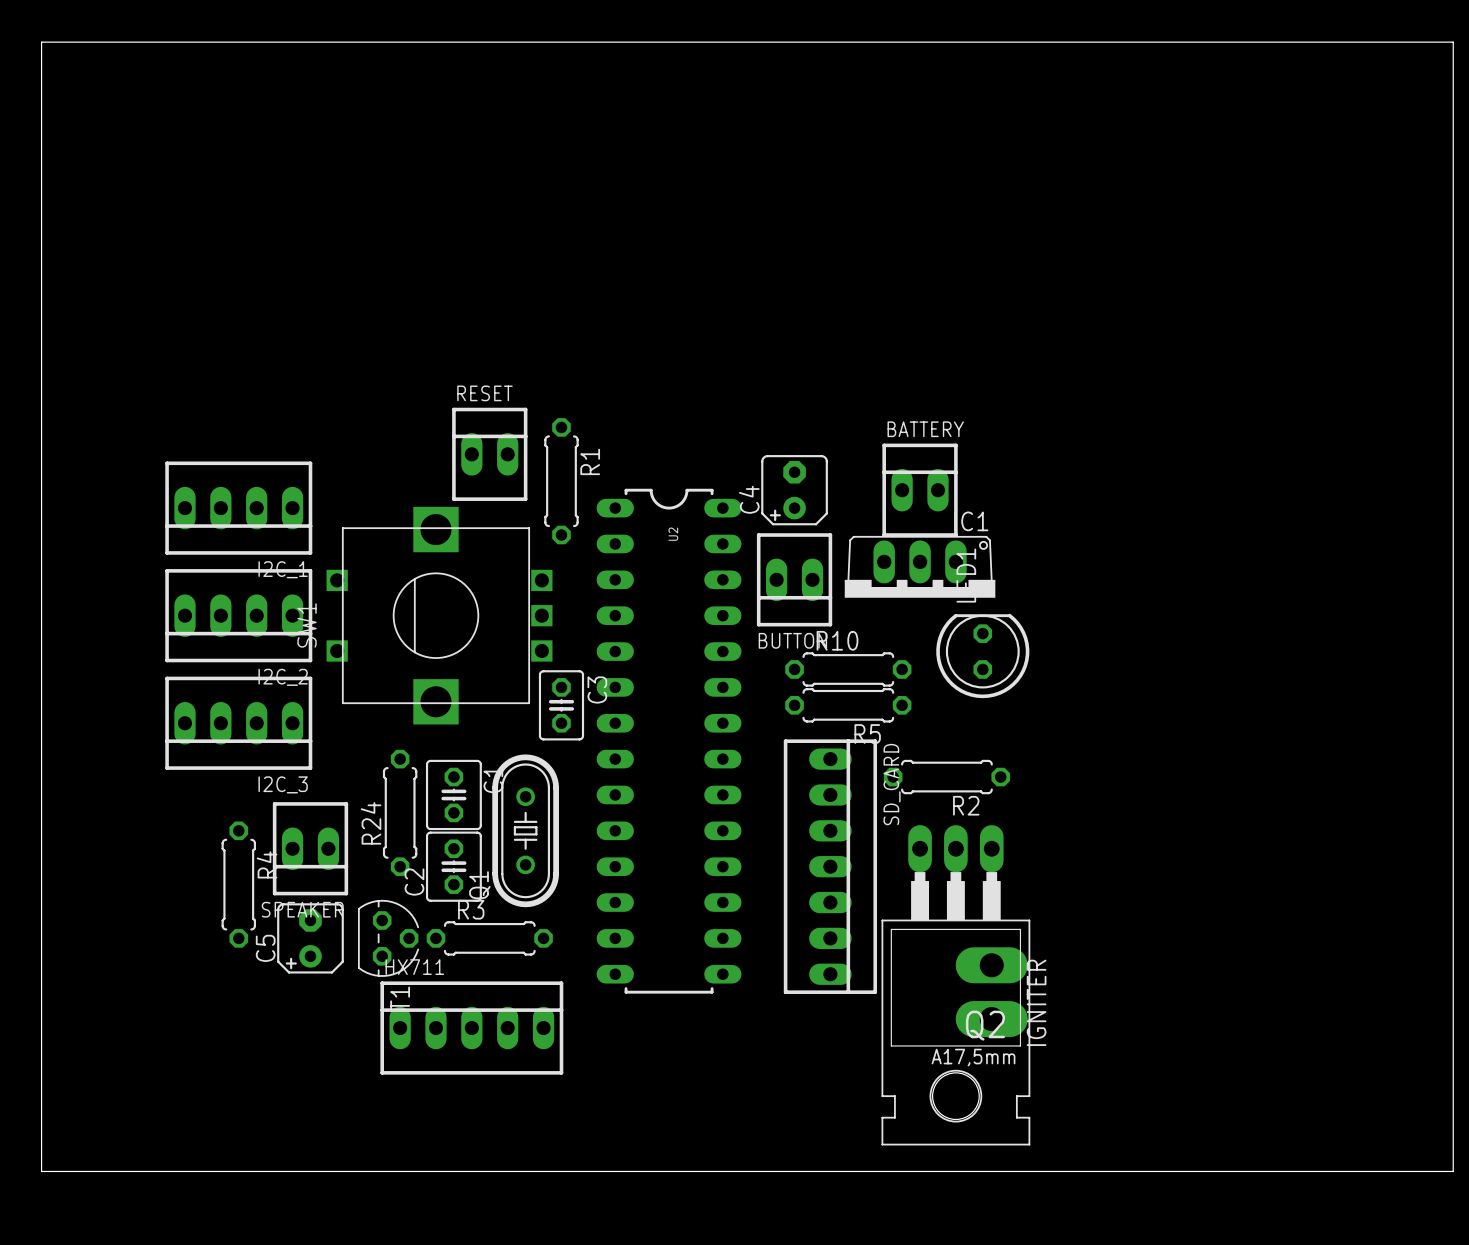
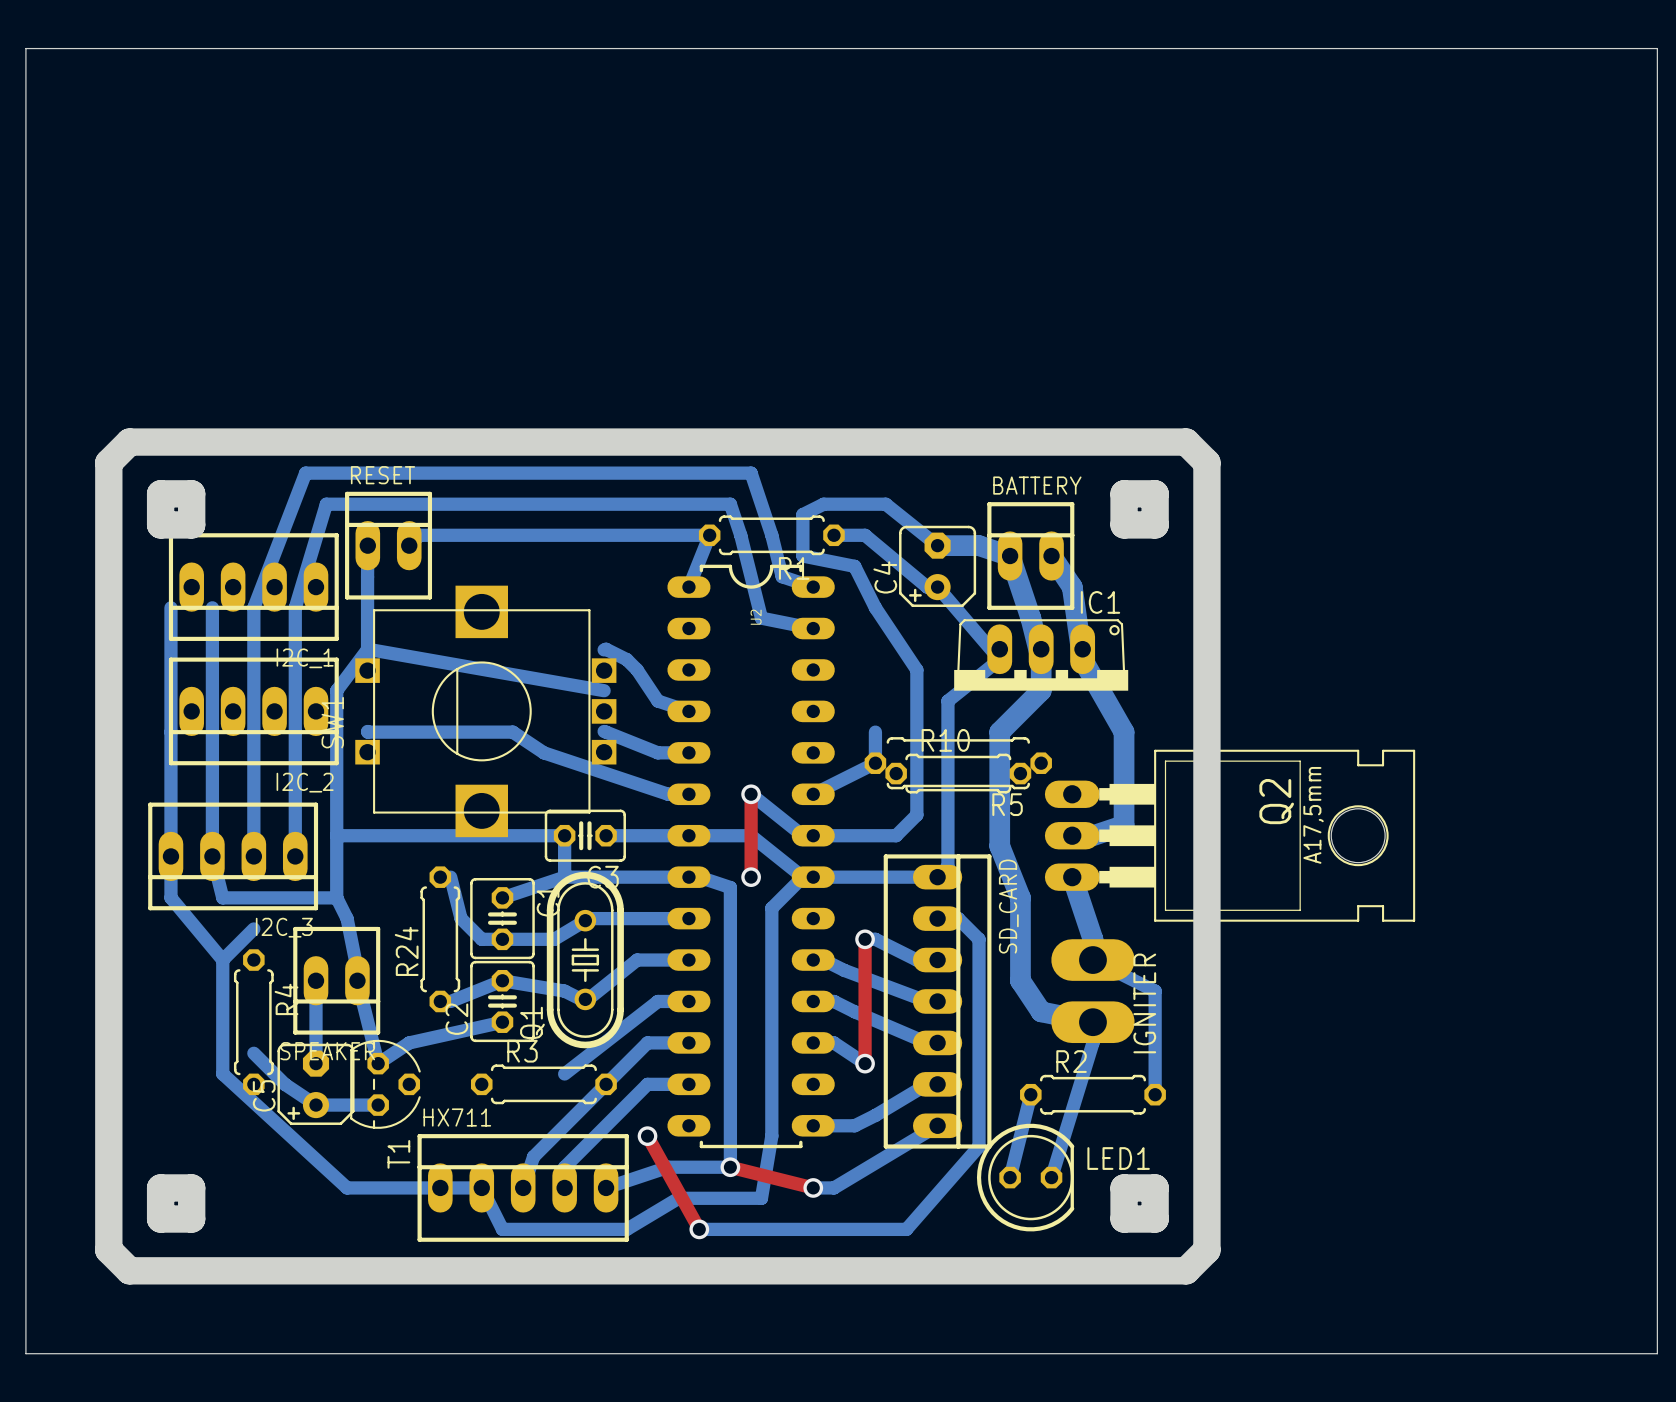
board edge: none -> (129, 442) (1186, 442) (1206, 462) (1206, 1250) (1186, 1270) (129, 1270) (108, 1250) (108, 462) (129, 442)
board edge: none -> (160, 493) (160, 524) (191, 524) (191, 493) (160, 493)
board edge: none -> (1124, 493) (1124, 524) (1155, 524) (1155, 493) (1124, 493)
RESET position: (489, 454) -> (388, 545)
bottom track: none -> (833, 535) (865, 535) (927, 587) (937, 587) (999, 659) (947, 701) (947, 866) (937, 877) (802, 877)
bottom track: none -> (367, 545) (367, 576) (367, 659) (367, 649)
bottom track: none -> (409, 545) (419, 535) (709, 535) (688, 587)
R1 rotation: 0° (561, 481) -> 90° clockwise (771, 535)
R1 position: (561, 481) -> (771, 535)
bottom track: none -> (1051, 556) (1072, 587) (1082, 659) (1124, 732) (1124, 825) (1092, 835) (1072, 835)
C4 position: (794, 490) -> (937, 566)
BATTERY position: (920, 490) -> (1030, 556)
bottom track: none -> (813, 587) (782, 576) (771, 535) (751, 473) (305, 473) (253, 607) (253, 856)
bottom track: none -> (170, 607) (170, 897) (222, 960)
bottom track: none -> (212, 607) (212, 856) (222, 897) (336, 897)
bottom track: none -> (813, 628) (761, 618) (740, 535) (730, 504) (326, 504) (295, 607) (295, 856)
bottom track: none -> (367, 649) (604, 690)
bottom track: none -> (367, 649) (336, 690) (336, 897)
bottom track: none -> (604, 649) (626, 659) (637, 669) (657, 701) (688, 711)
BUTTON: (794, 579) -> none
bottom track: none -> (367, 731) (512, 732) (543, 752) (668, 794) (688, 794)
bottom track: none -> (604, 731) (657, 752) (688, 752)
bottom track: none -> (875, 732) (875, 763) (813, 794)
LED1 rotation: 0° (982, 656) -> 90° clockwise (1025, 1177)
LED1 position: (982, 656) -> (1025, 1177)
bottom track: none -> (751, 794) (802, 835) (896, 835) (916, 815) (916, 669) (875, 607) (854, 566) (802, 556) (802, 514) (823, 504) (885, 504) (937, 545) (979, 545) (1010, 556) (1030, 618) (1041, 659) (1041, 690) (999, 732) (999, 846) (1020, 897) (1020, 980) (1041, 1011) (1092, 1022) (1092, 1042) (1051, 1177)
top track: none -> (751, 794) (751, 877)
via: none -> (751, 794)
R5 footprint: [785, 688, 912, 723] -> [864, 737, 1052, 790]
C3 rotation: 0° (561, 705) -> 90° clockwise (585, 835)
I2C_3 position: (238, 723) -> (233, 856)
bottom track: none -> (336, 835) (564, 835) (564, 877)
bottom track: none -> (606, 835) (751, 835) (802, 877)
bottom track: none -> (450, 877) (461, 918) (481, 939) (554, 939) (585, 920) (585, 918) (688, 918)
bottom track: none -> (564, 877) (699, 877) (730, 887) (730, 1167) (668, 1167) (606, 1187)
bottom track: none -> (564, 877) (502, 897)
via: none -> (751, 877)
bottom track: none -> (802, 877) (771, 908) (771, 1136) (761, 1198) (678, 1198) (626, 1229) (502, 1229) (481, 1187) (347, 1187) (222, 1073) (222, 960)
bottom track: none -> (1072, 877) (1092, 939) (1092, 960) (1155, 991) (1155, 1094)
bottom track: none -> (336, 897) (347, 918) (357, 970) (357, 980) (378, 1063) (409, 1042) (502, 1022)
R2 position: (946, 777) -> (1092, 1094)
bottom track: none -> (937, 918) (958, 918) (979, 939) (979, 1146) (906, 1229) (699, 1229)
bottom track: none -> (253, 928) (222, 960)
R2 name position: R2 (966, 805) -> R2 (1071, 1061)
bottom track: none -> (865, 939) (875, 939) (916, 960) (937, 960)
top track: none -> (865, 939) (865, 1063)
via: none -> (865, 939)
bottom track: none -> (688, 960) (637, 960) (585, 1001)
bottom track: none -> (813, 960) (823, 960) (844, 970) (927, 1001) (937, 1001)
bottom track: none -> (316, 980) (316, 1063)
bottom track: none -> (450, 1001) (502, 980) (564, 991) (585, 1001)
bottom track: none -> (688, 1001) (657, 1001) (564, 1073)
bottom track: none -> (813, 1001) (833, 1001) (927, 1042) (937, 1042)
bottom track: none -> (688, 1042) (647, 1042) (533, 1156) (523, 1187)
bottom track: none -> (813, 1042) (833, 1042) (865, 1063)
bottom track: none -> (253, 1053) (284, 1084) (316, 1105) (378, 1105)
via: none -> (865, 1063)
C5 position: (310, 938) -> (316, 1084)
T1 position: (388, 938) -> (385, 1084)
bottom track: none -> (688, 1084) (647, 1084) (564, 1167) (564, 1187)
bottom track: none -> (937, 1084) (927, 1084) (854, 1125) (813, 1125)
bottom track: none -> (1030, 1094) (1010, 1177)
bottom track: none -> (937, 1125) (833, 1187) (813, 1187)
top track: none -> (647, 1136) (699, 1229)
via: none -> (647, 1136)
Q2 rotation: 0° (955, 985) -> 90° counterclockwise (1230, 835)
Q2 position: (955, 985) -> (1230, 835)
IGNITER position: (991, 992) -> (1092, 991)
top track: none -> (730, 1167) (813, 1187)
via: none -> (730, 1167)
board edge: none -> (160, 1187) (191, 1187) (191, 1219) (160, 1219) (160, 1187)
via: none -> (813, 1187)
board edge: none -> (1124, 1187) (1155, 1187) (1155, 1219) (1124, 1219) (1124, 1187)
via: none -> (699, 1229)

